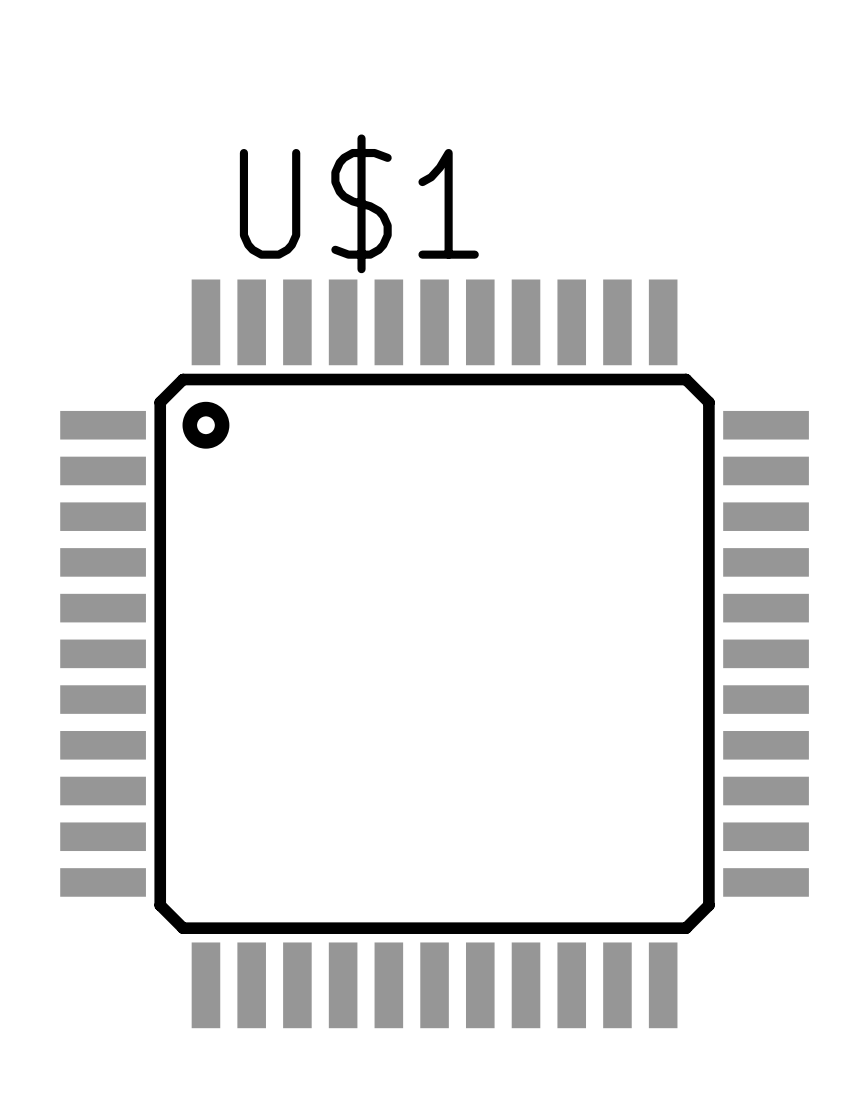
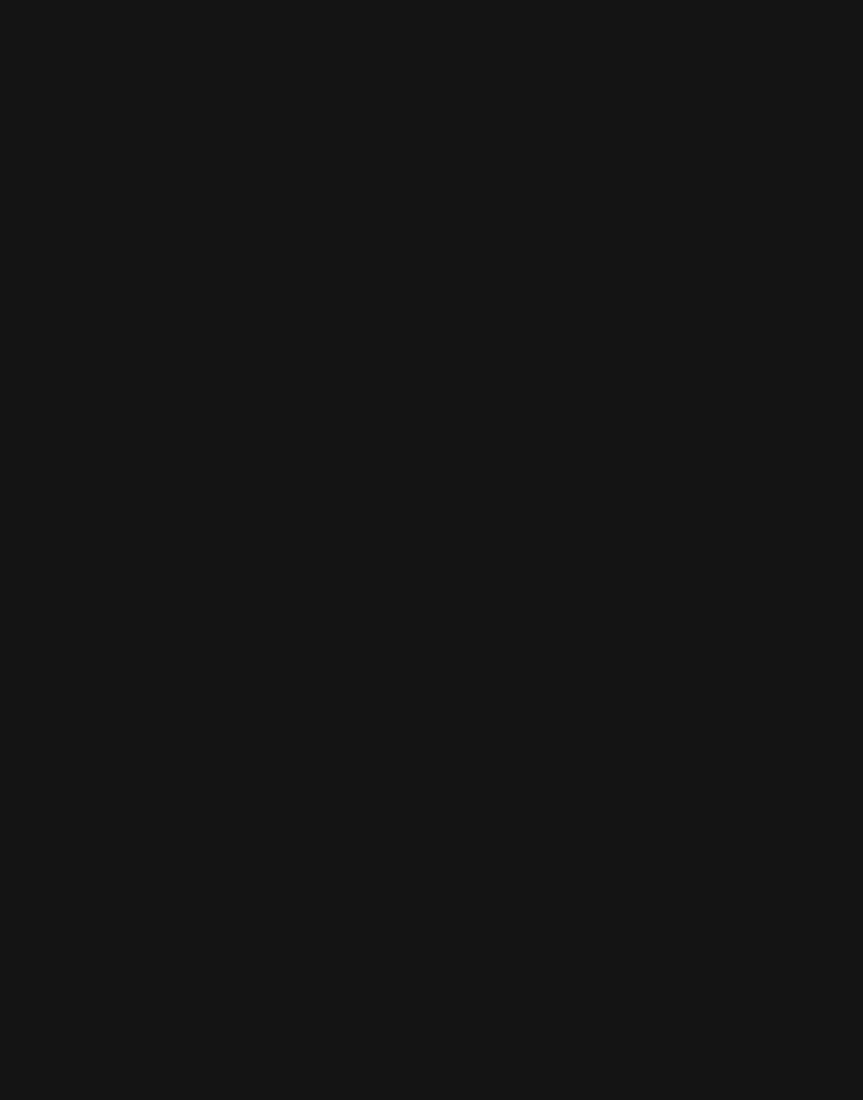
U$1: (434, 653) -> none

